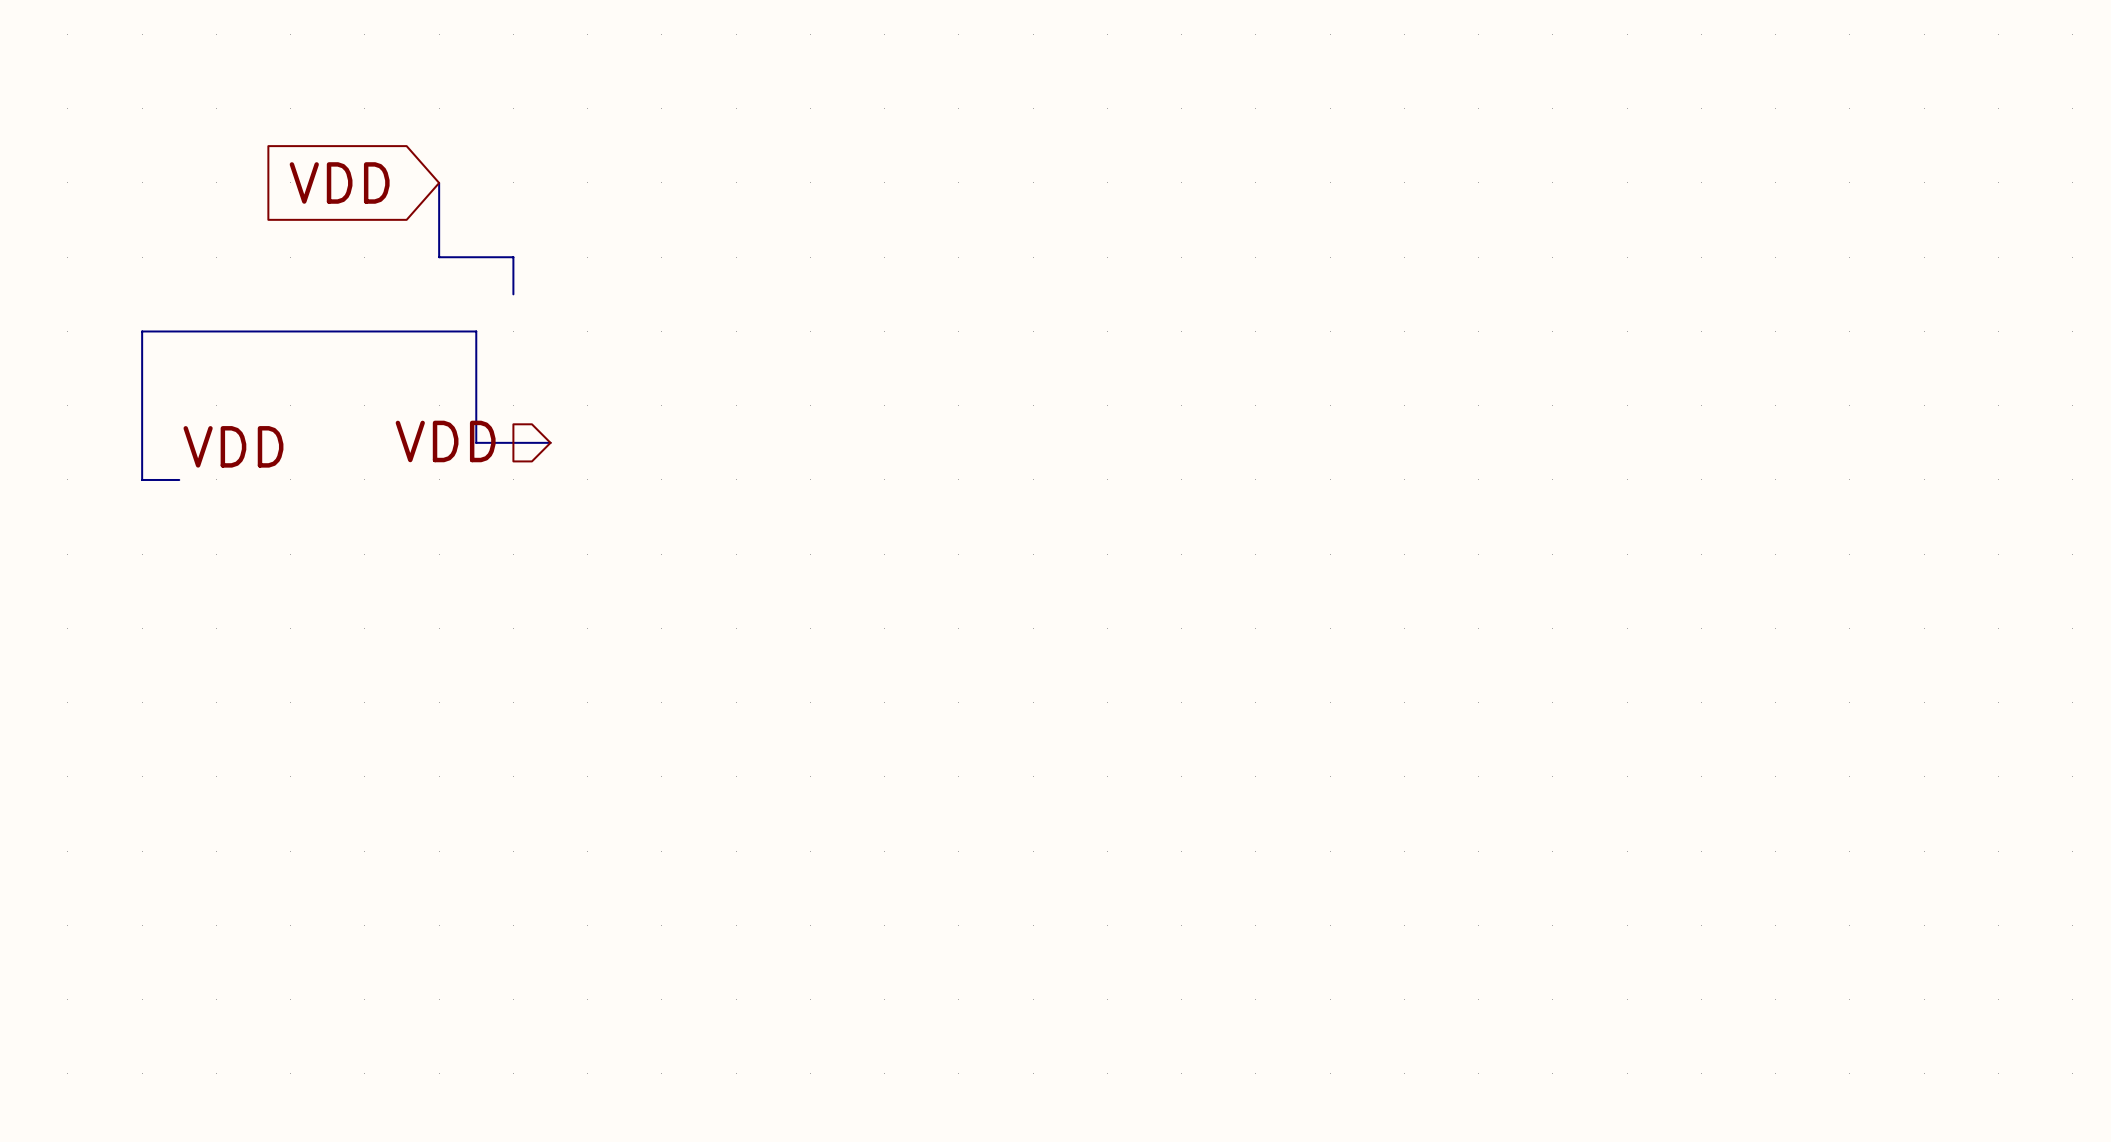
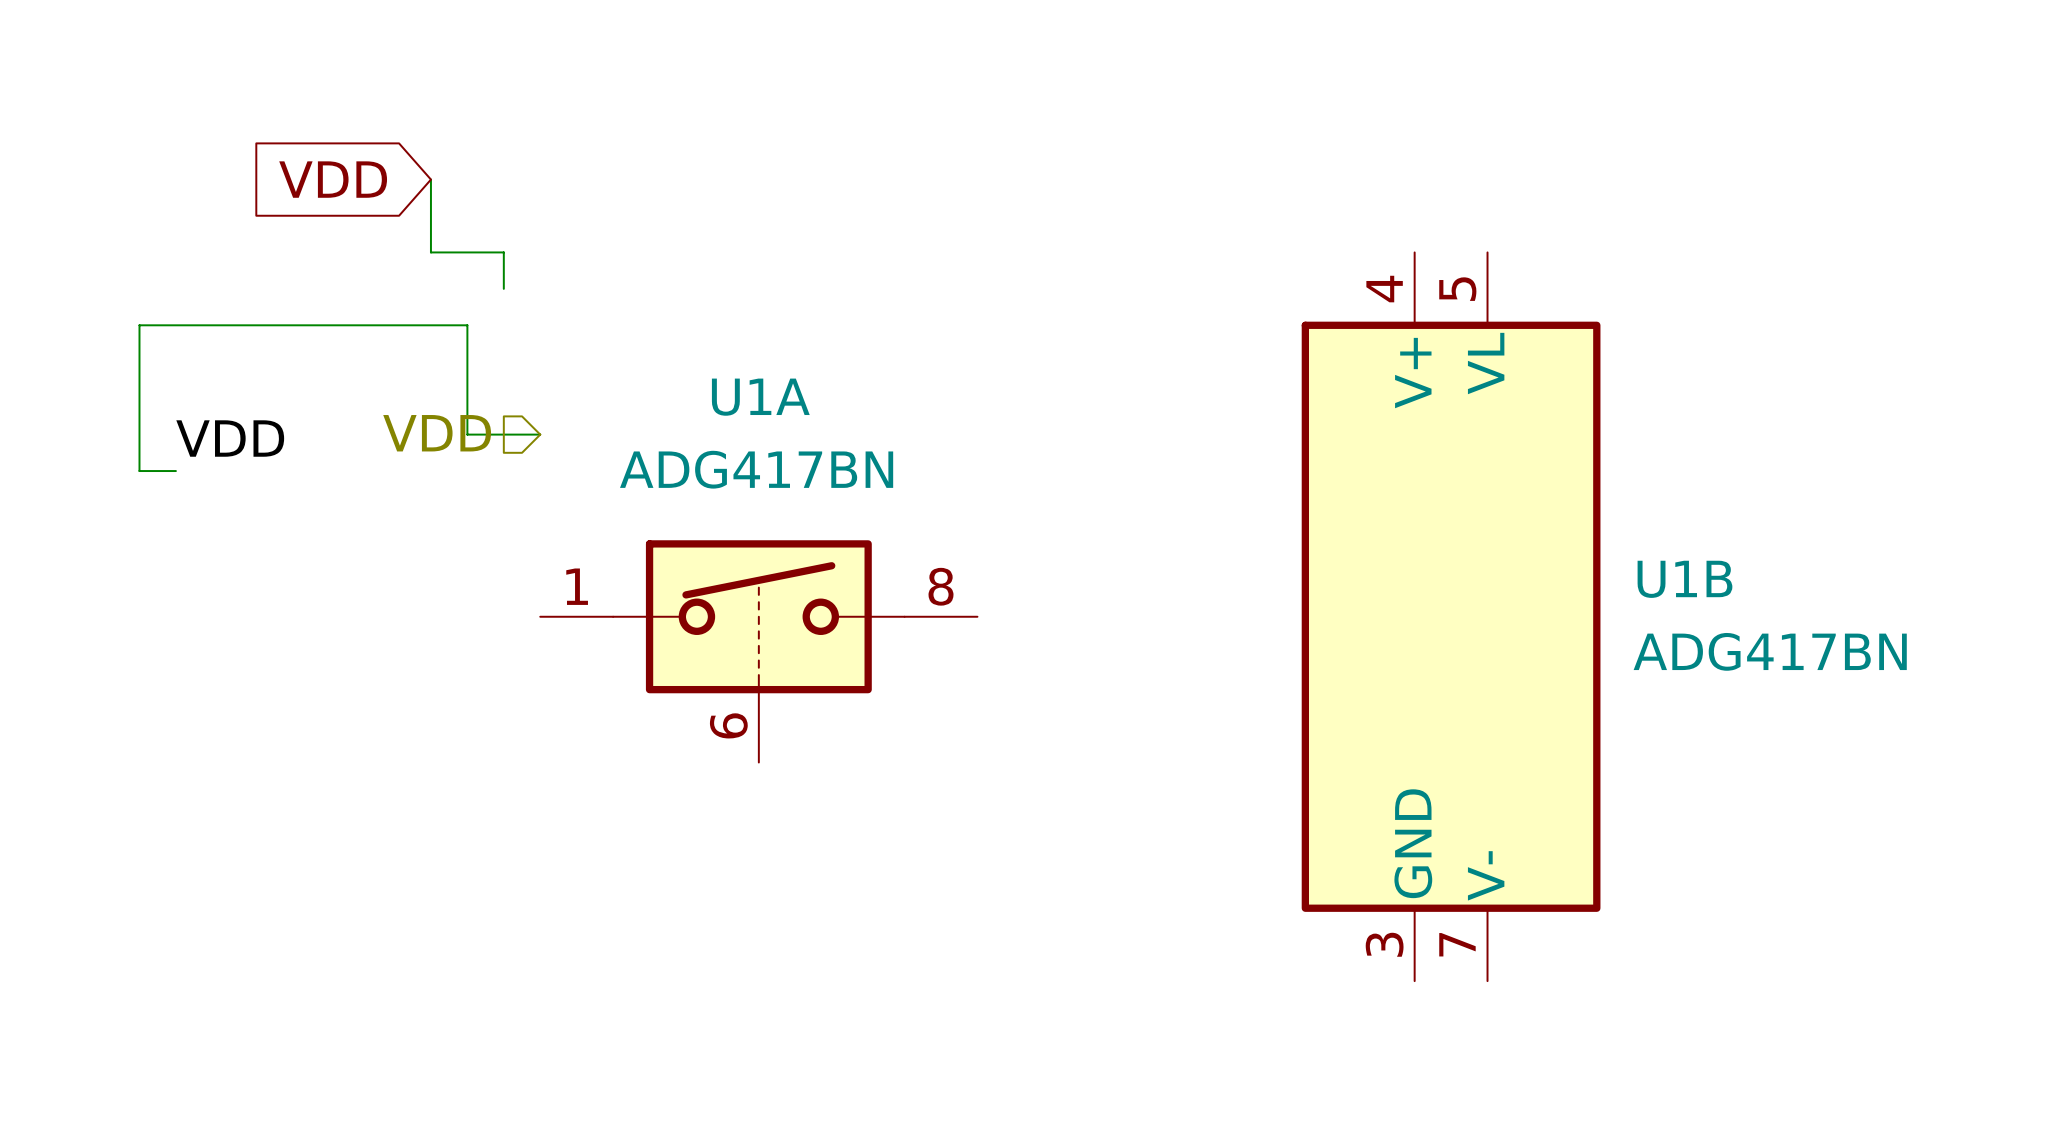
U1B: none -> ADG417BN (1451, 616)
U1A: none -> ADG417BN (758, 651)

